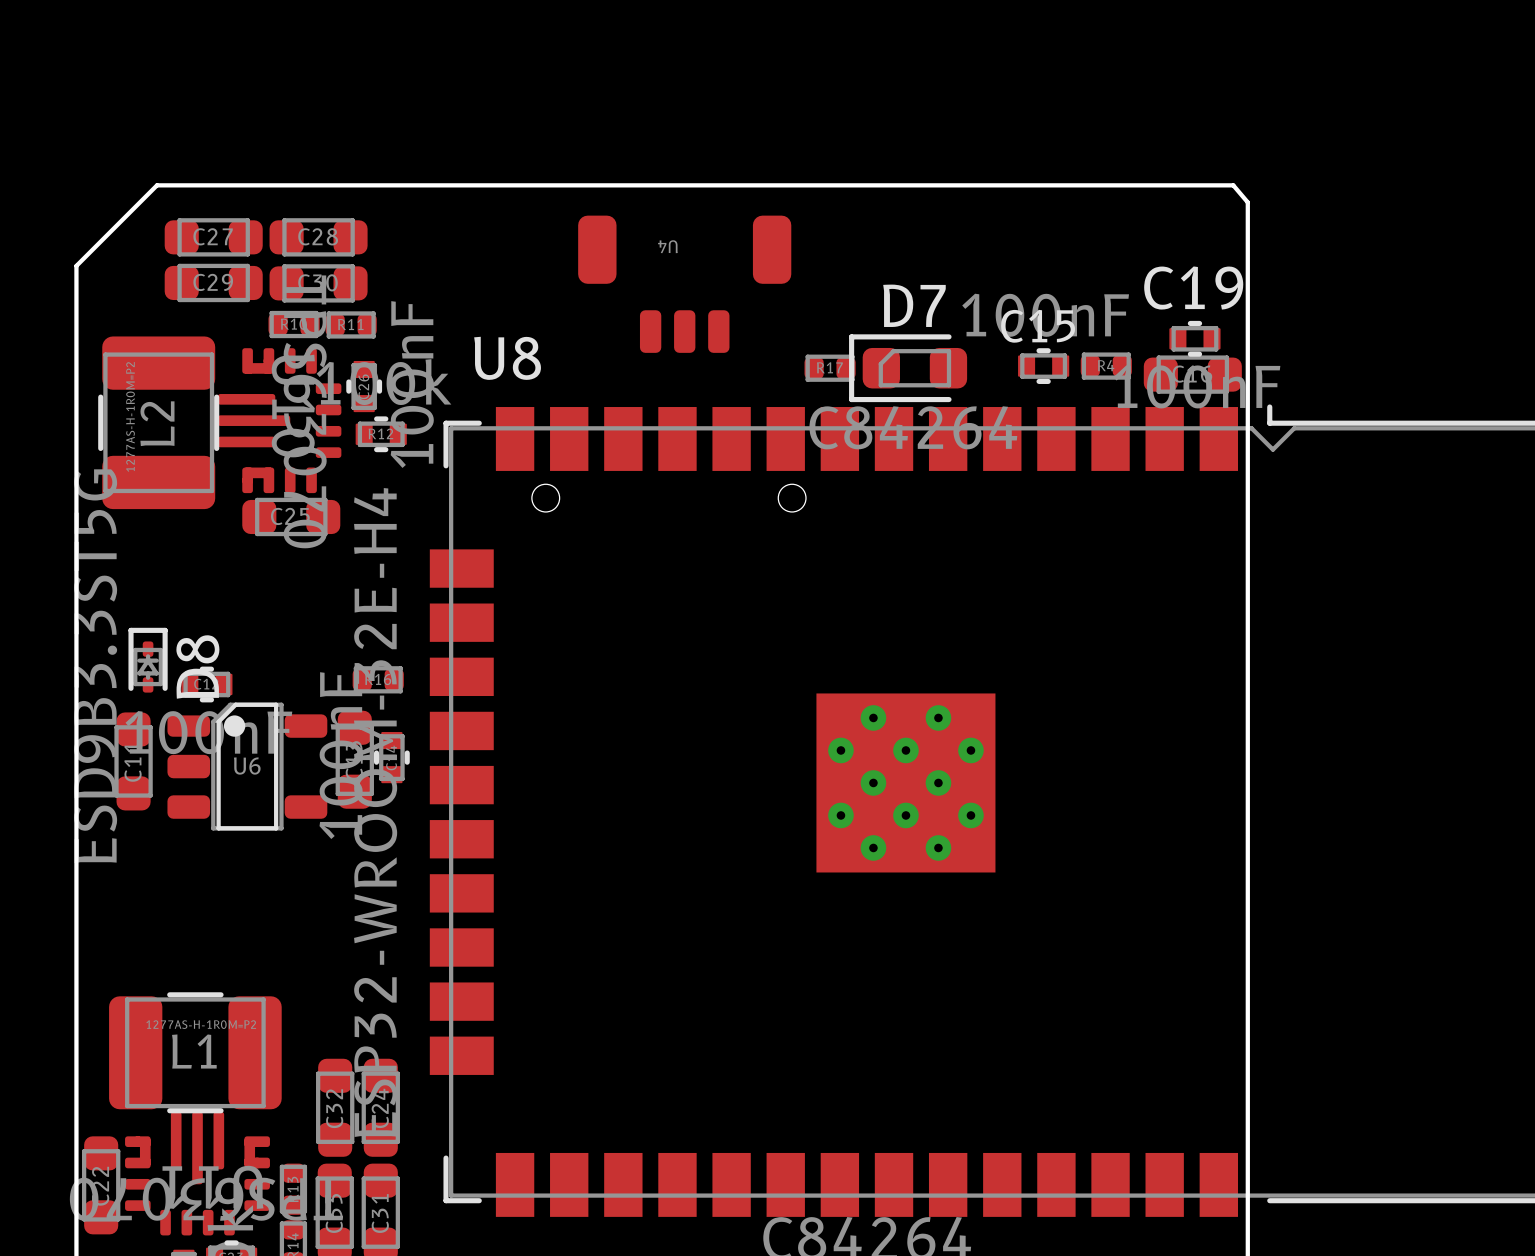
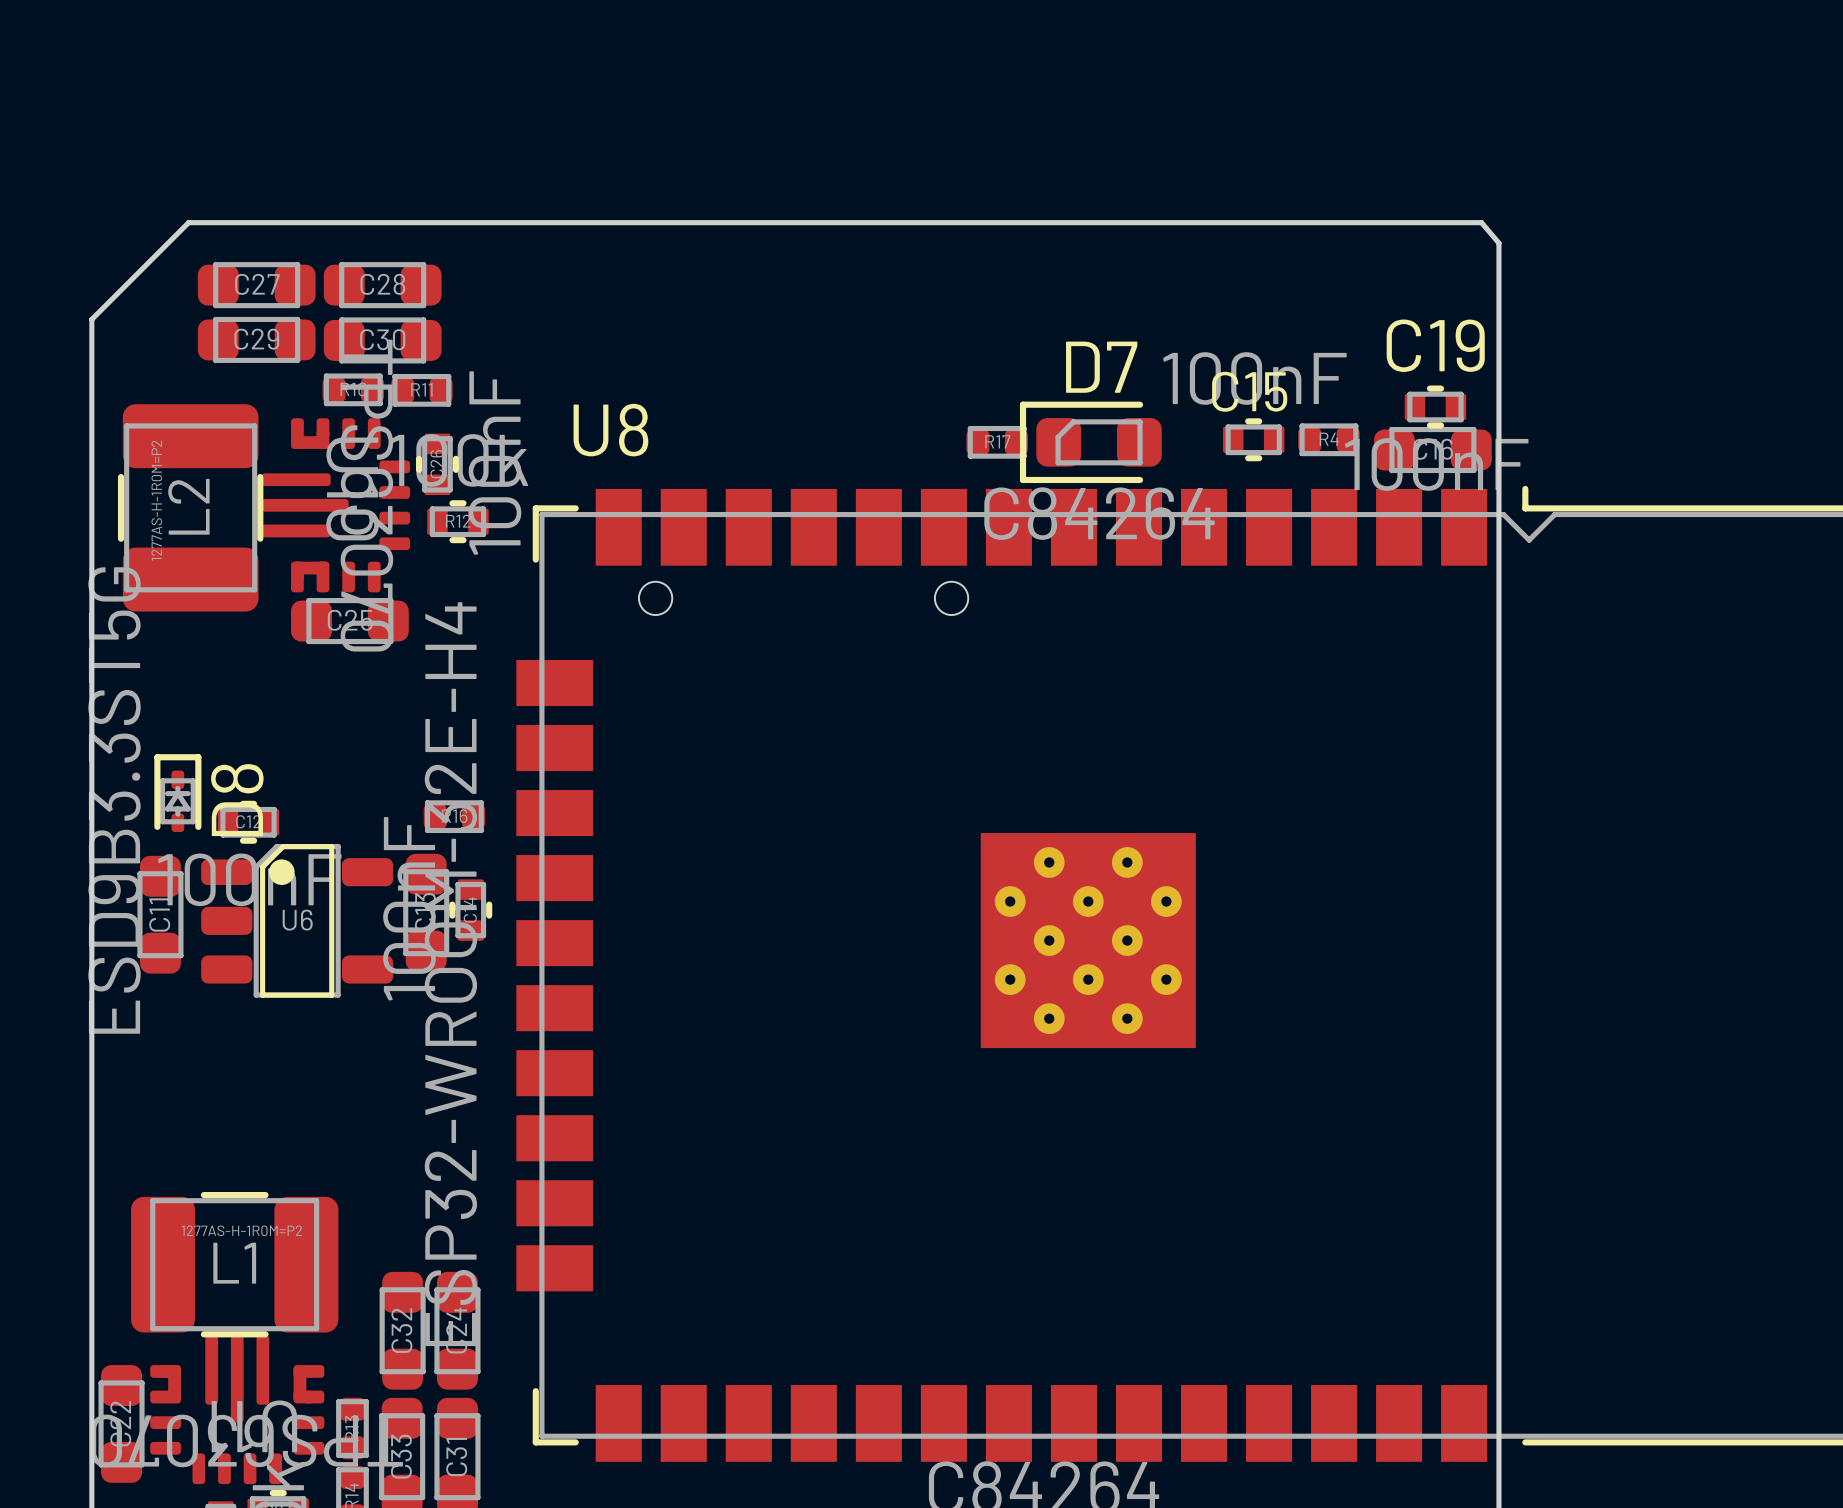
U4: (684, 284) -> none

